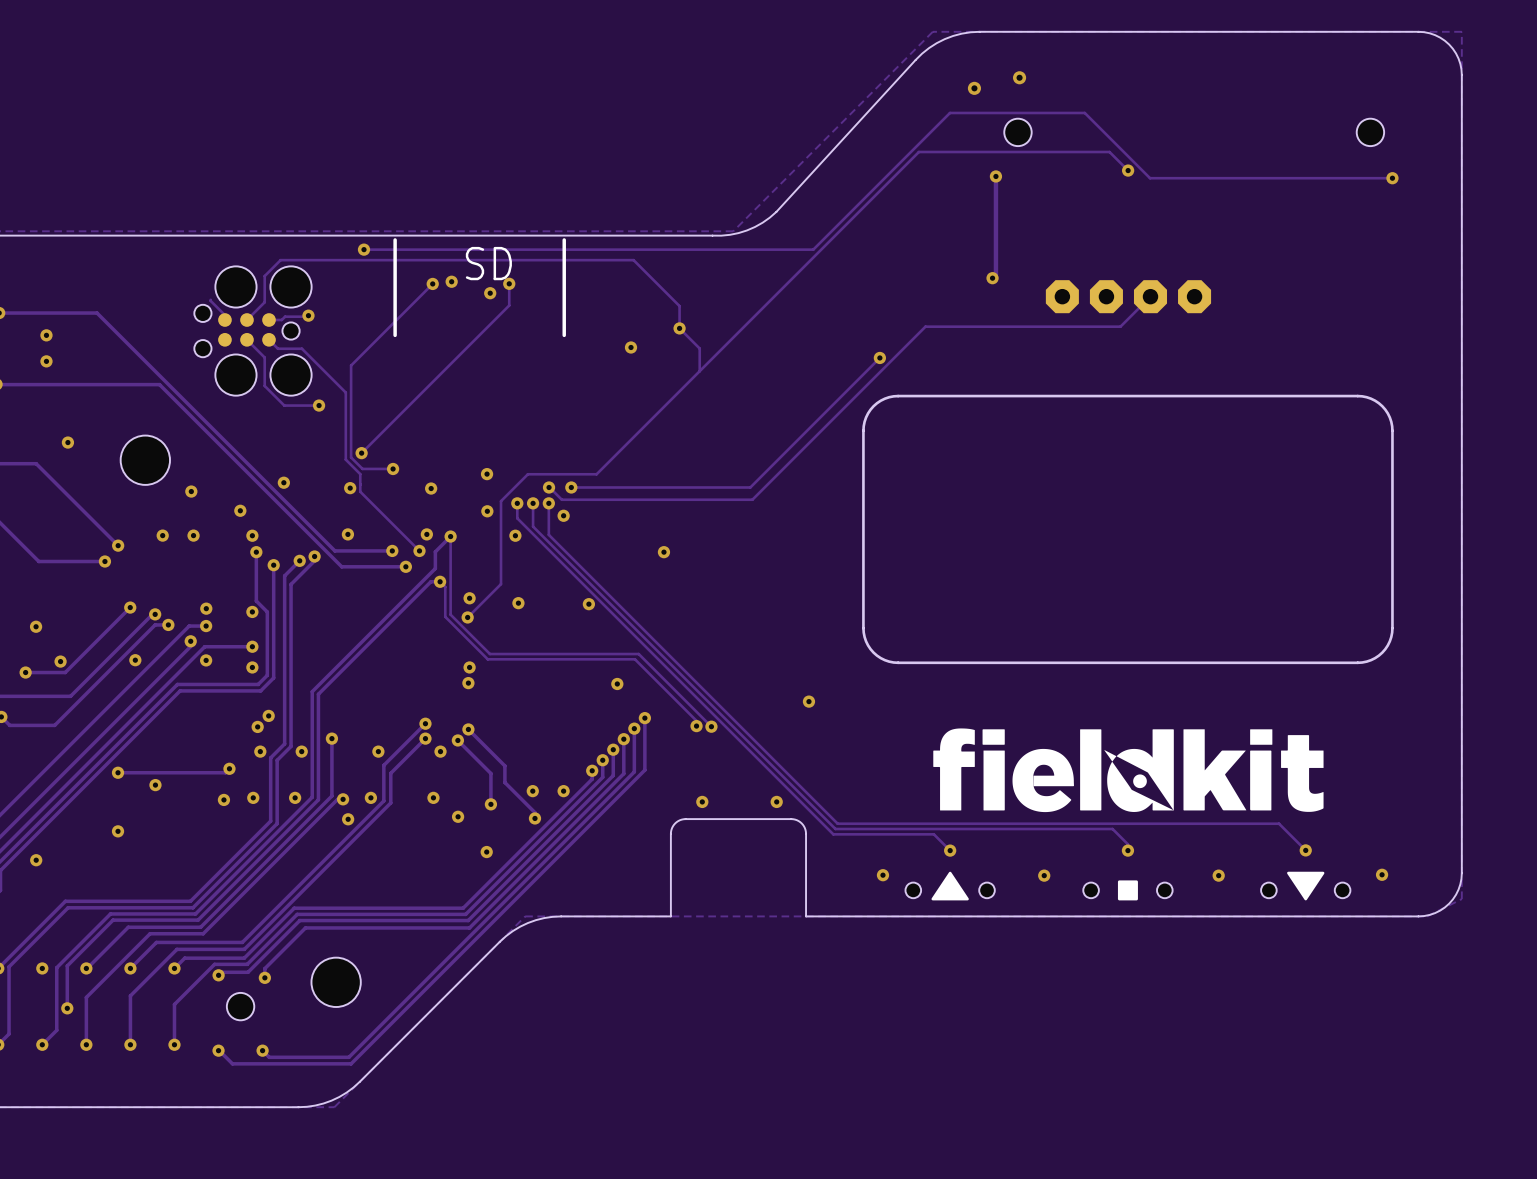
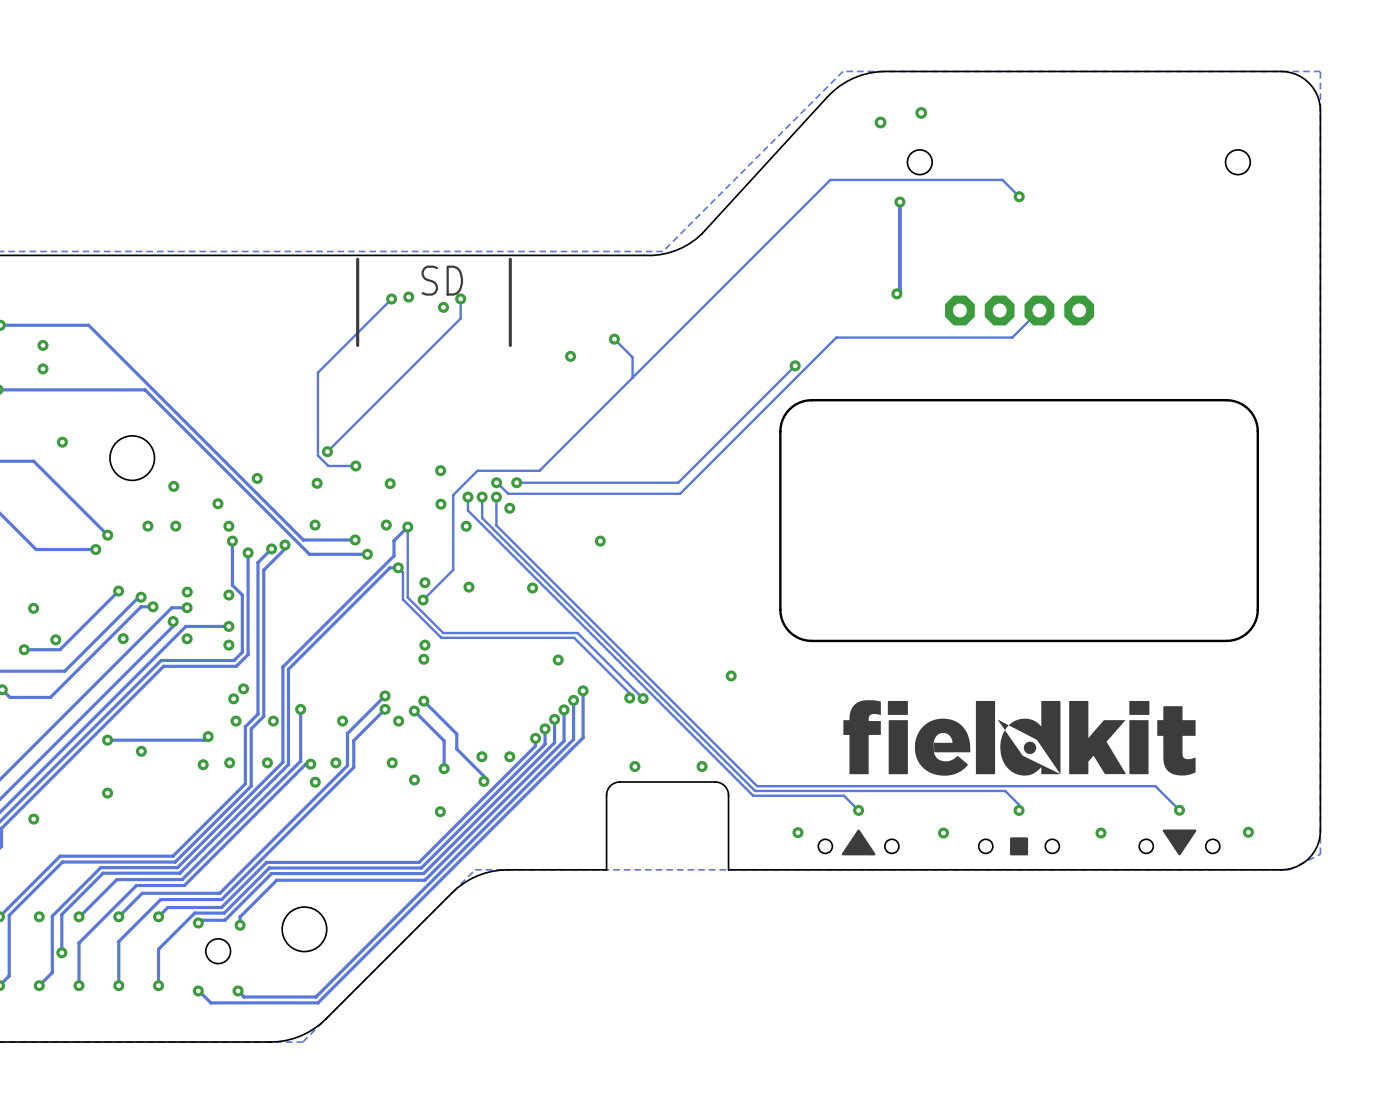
track: (1392, 178) (1150, 178) (1084, 112) (949, 112) (813, 249) (363, 249) -> none
via: (1392, 178) -> none
via: (363, 249) -> none
track: (210, 299) (224, 315) (224, 320) -> none
track: (308, 315) (285, 316) (281, 320) (269, 320) -> none
via: (308, 315) -> none
track: (246, 320) (264, 302) (264, 276) (280, 260) (633, 260) (679, 306) (679, 328) -> none
part: (252, 331) -> none
track: (246, 339) (264, 357) (264, 385) (284, 405) (319, 405) -> none
track: (269, 339) (277, 348) (301, 348) (345, 392) (345, 459) (360, 474) (360, 491) (419, 550) -> none
via: (319, 405) -> none
via: (419, 550) -> none

